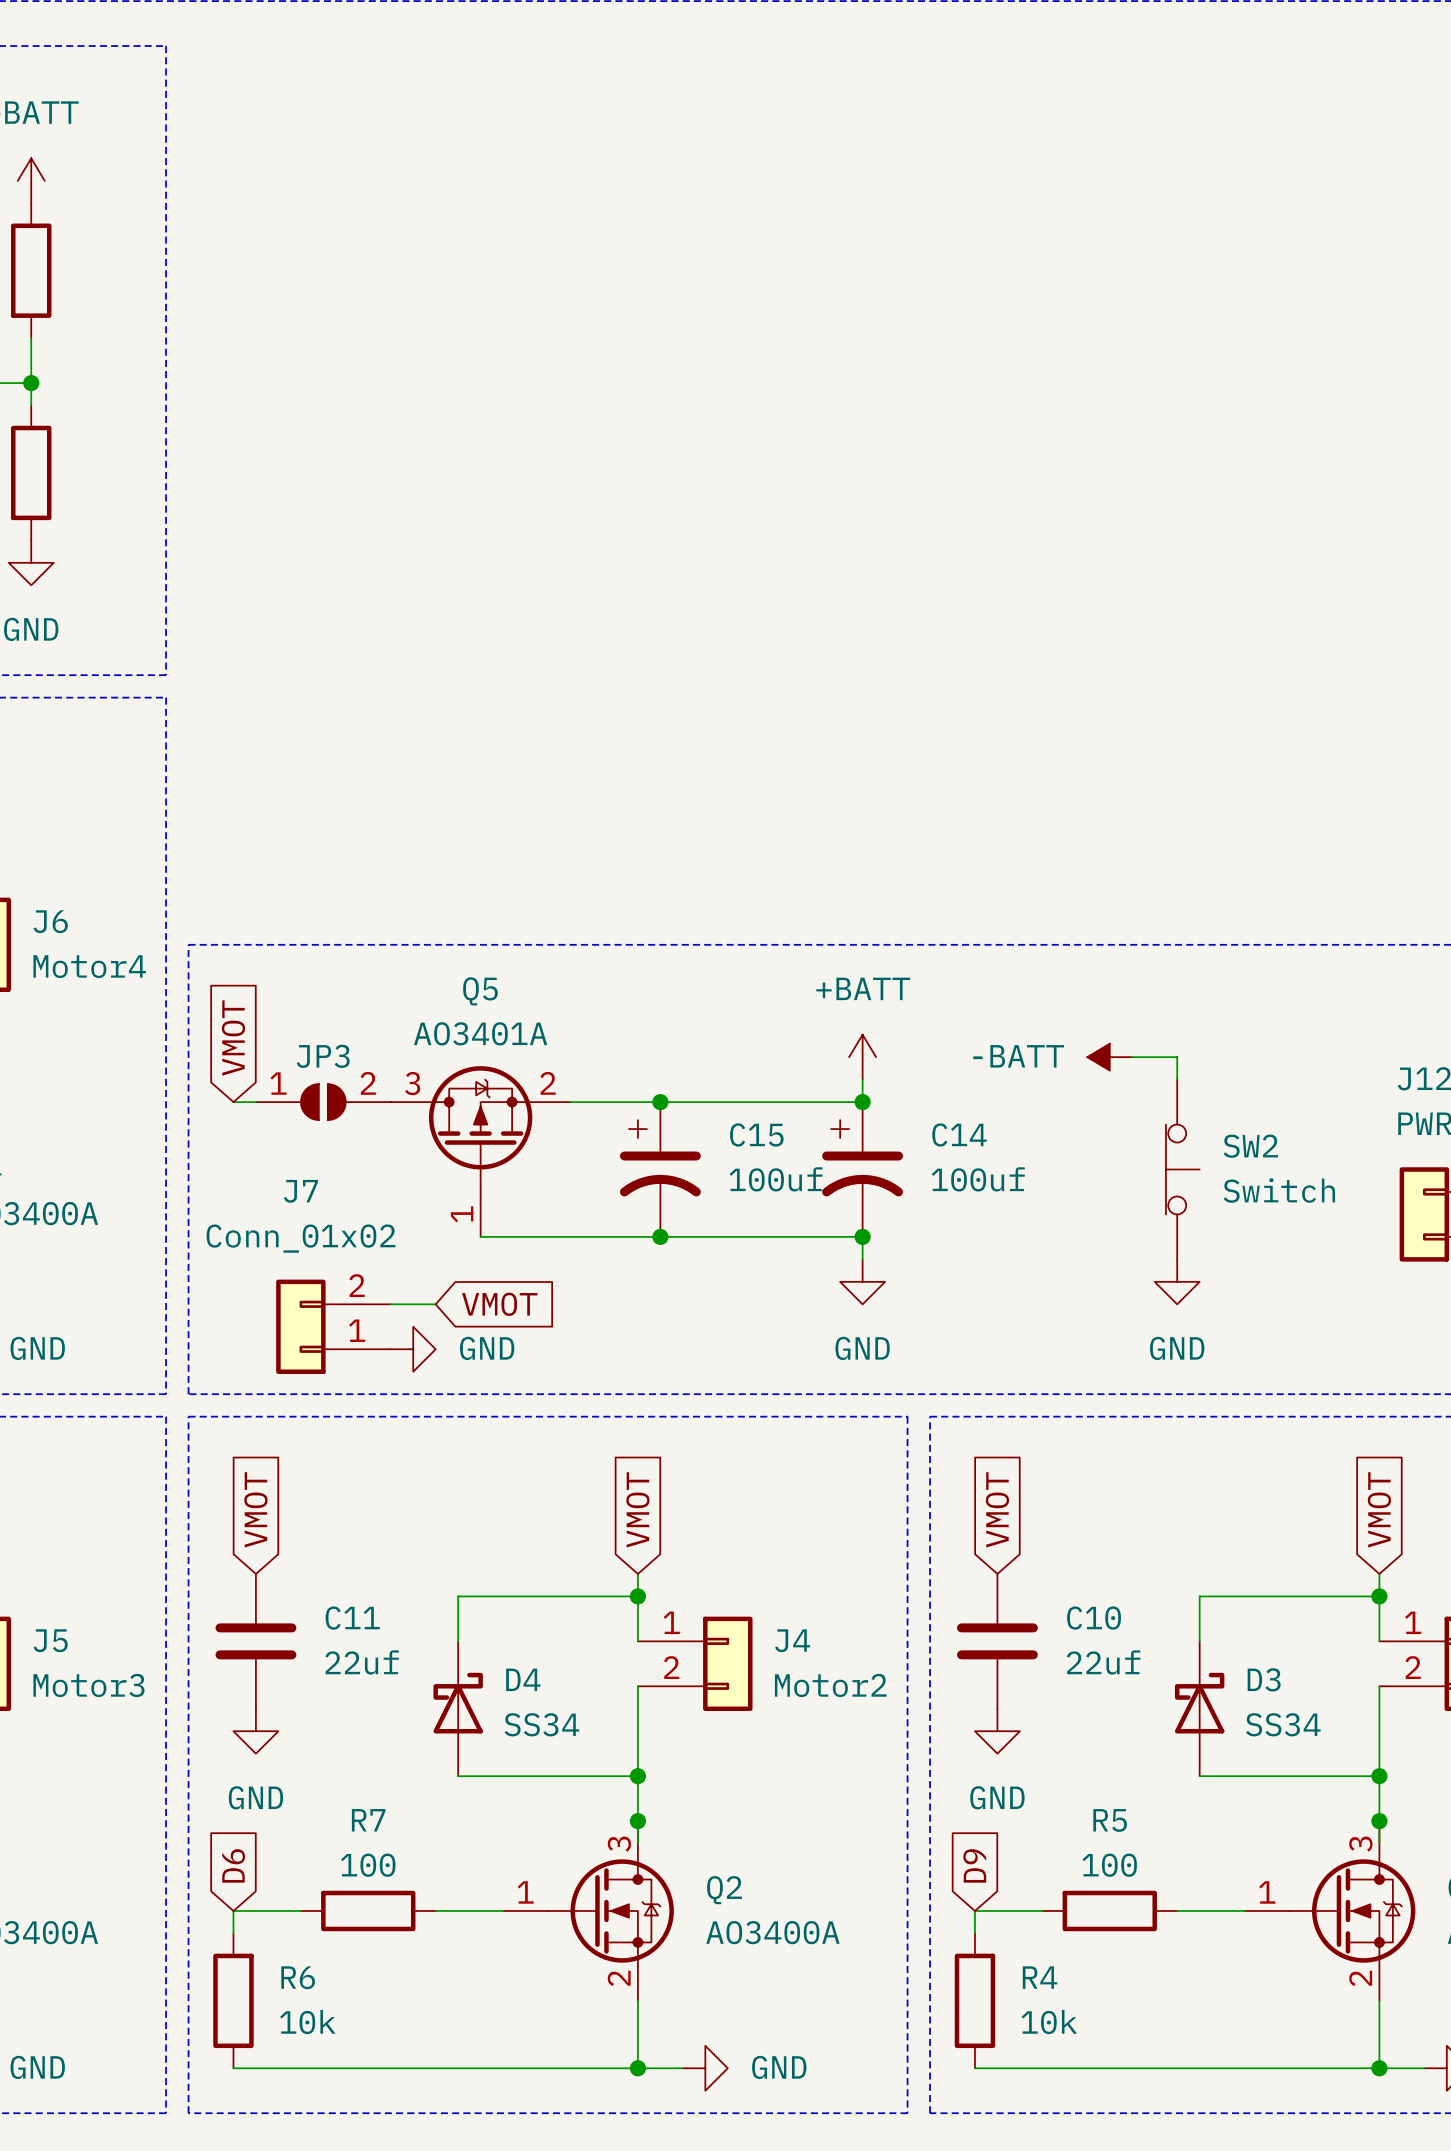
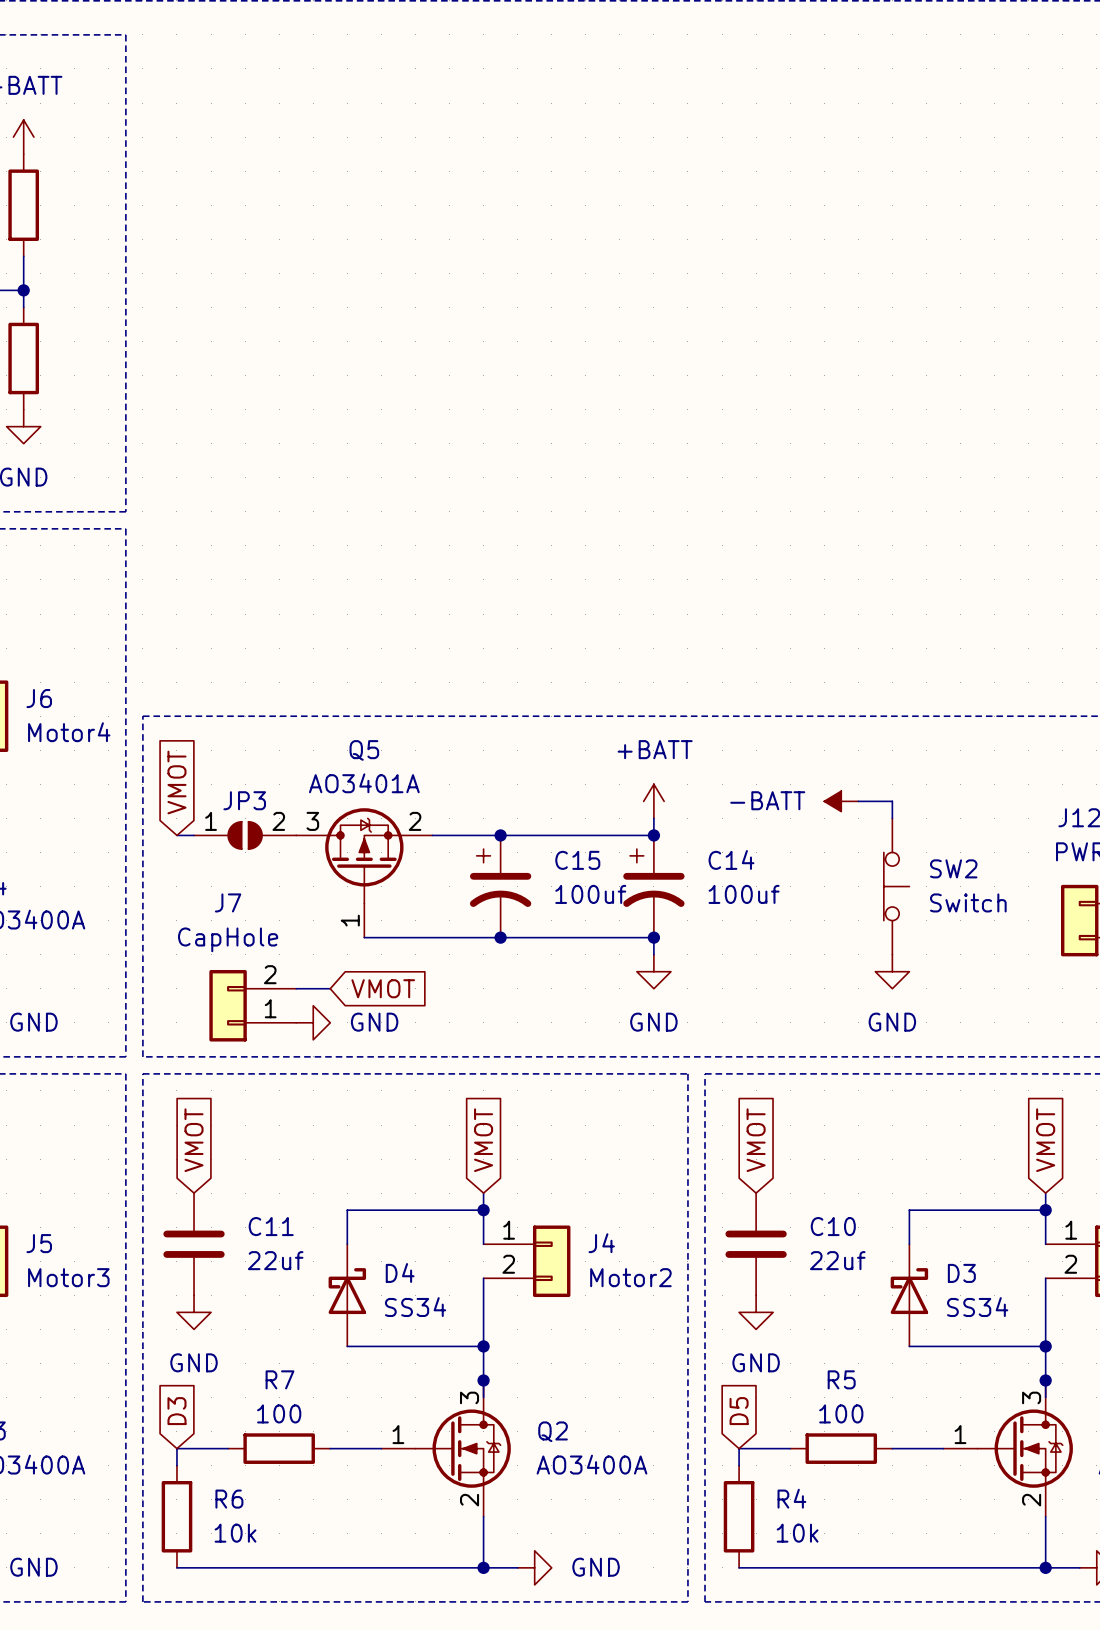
J7 value: Conn_01x02 (300, 1238) -> CapHole (228, 939)
global label: D6 (233, 1865) -> D3 (176, 1411)
global label: D9 (974, 1865) -> D5 (739, 1411)

